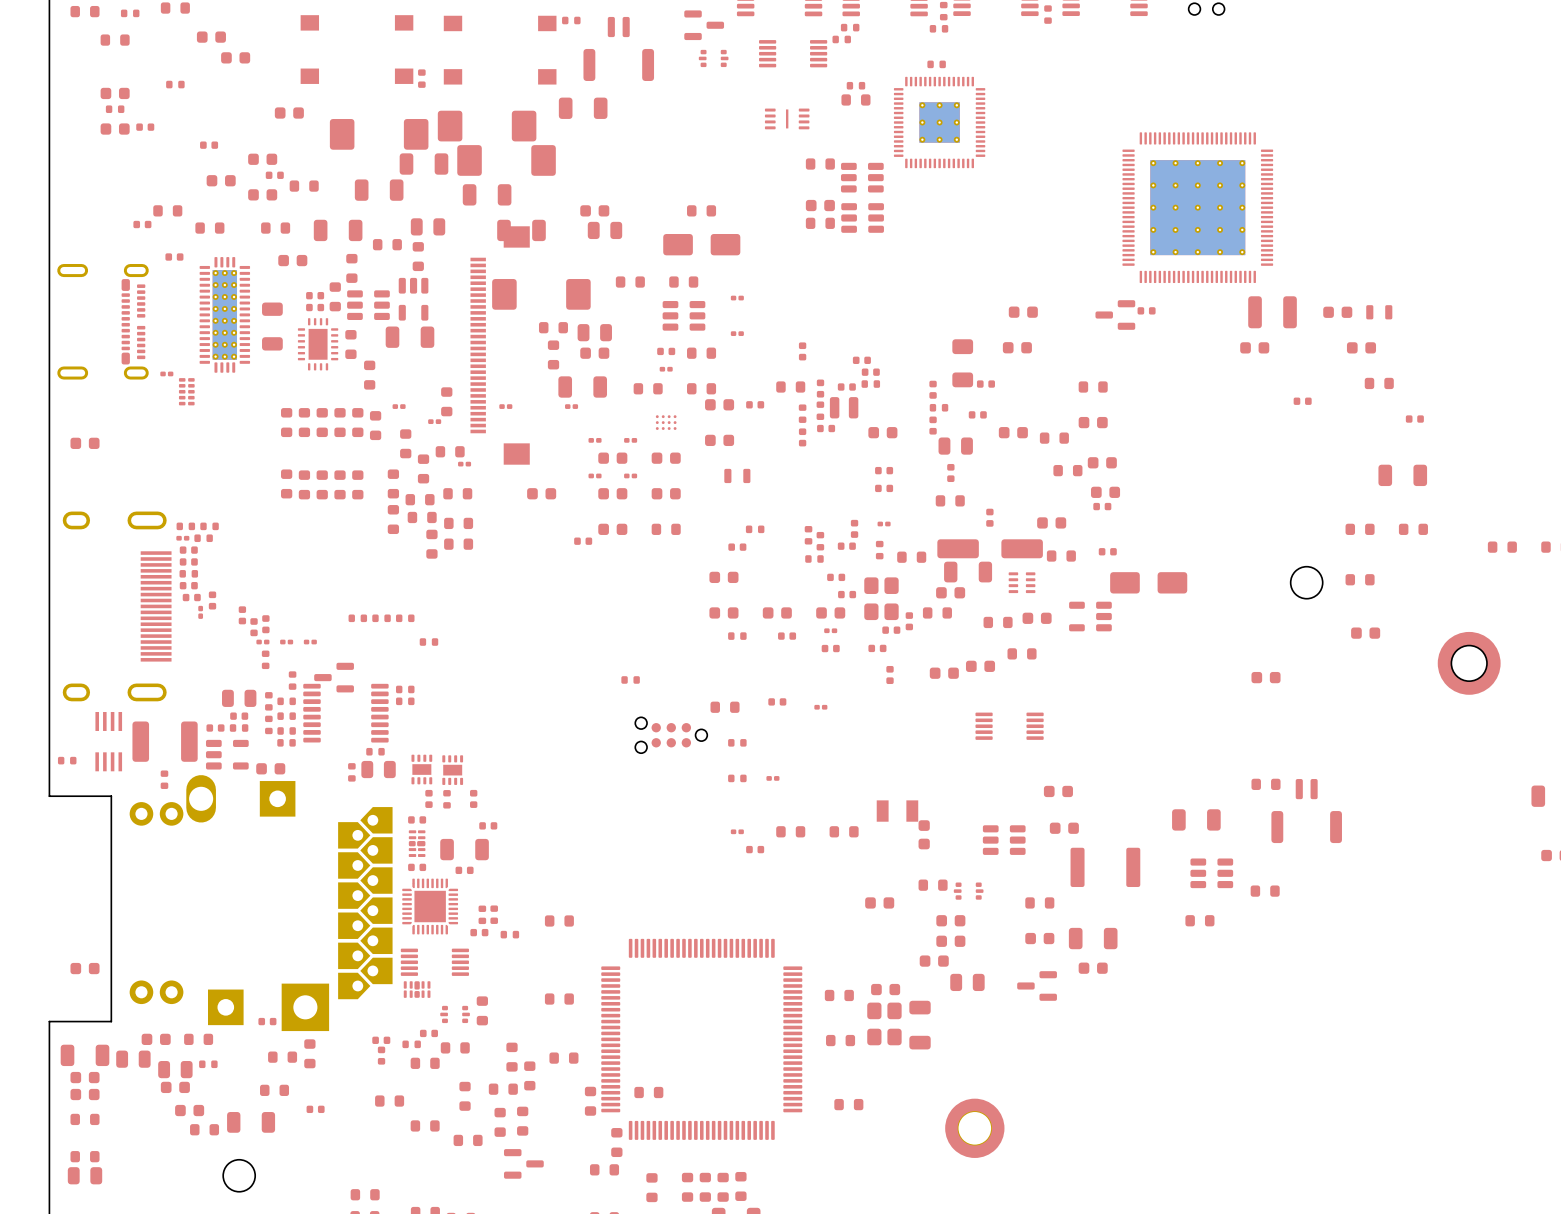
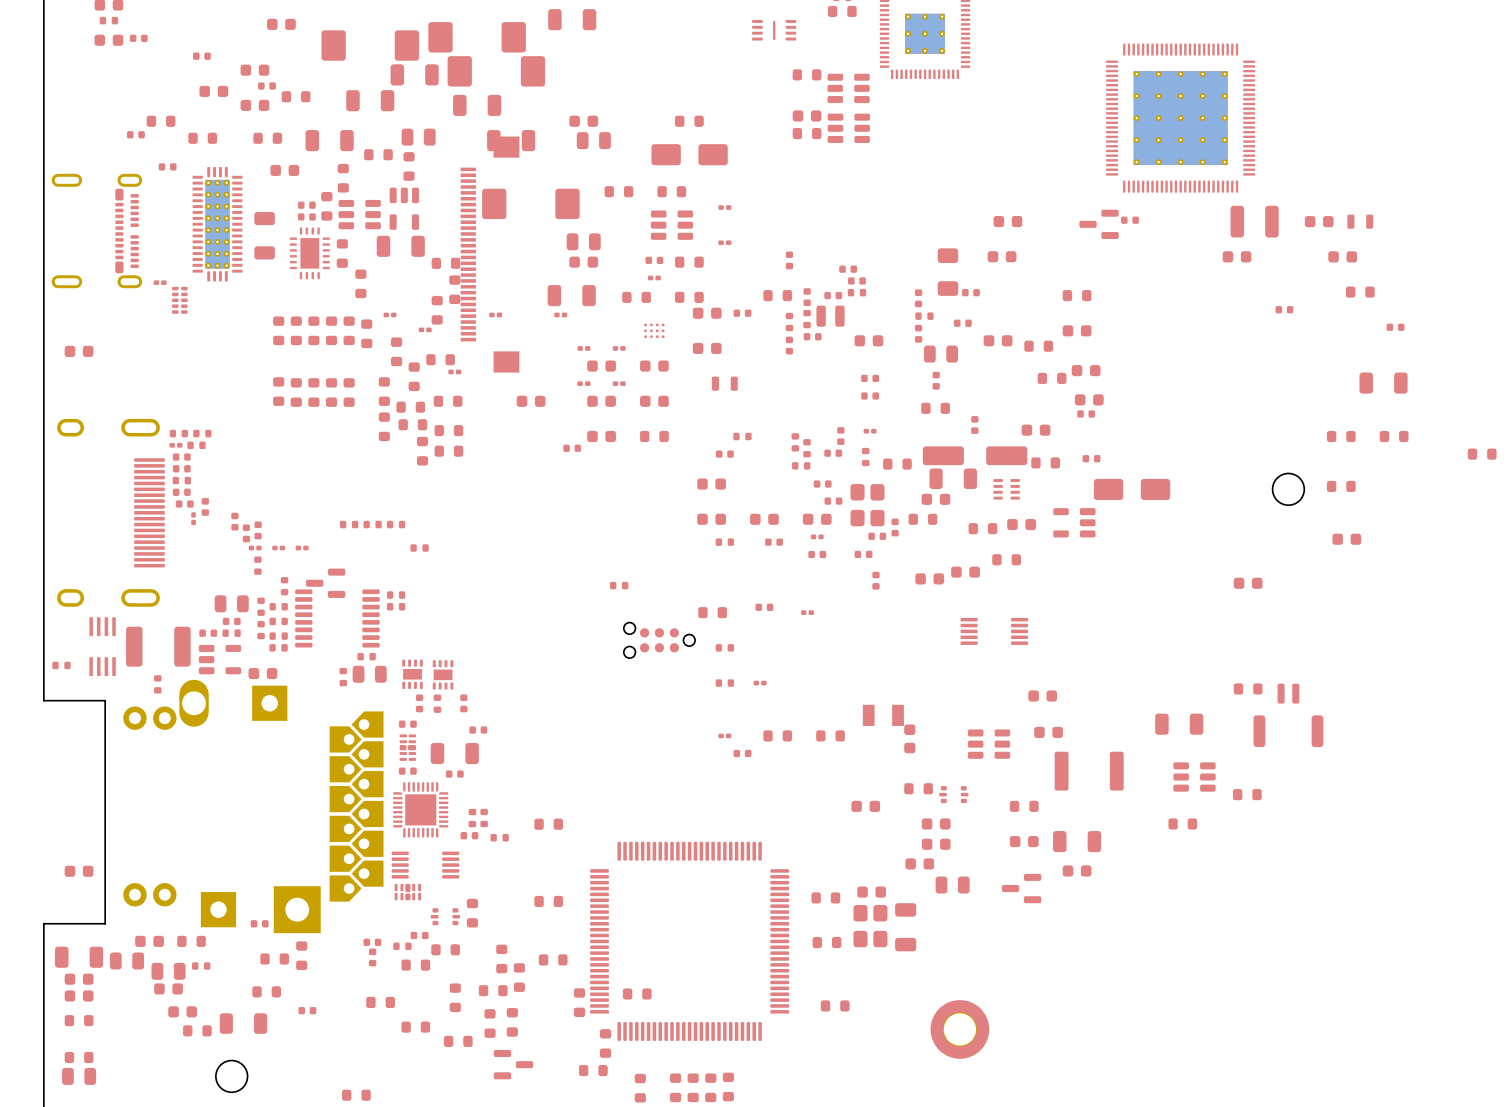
part: (553, 327) -> none
part: none -> (445, 263)
part: (553, 354) -> none
part: none -> (454, 289)
part: (1469, 663) -> none

